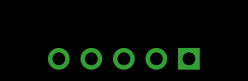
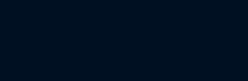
part: (123, 58) -> none

